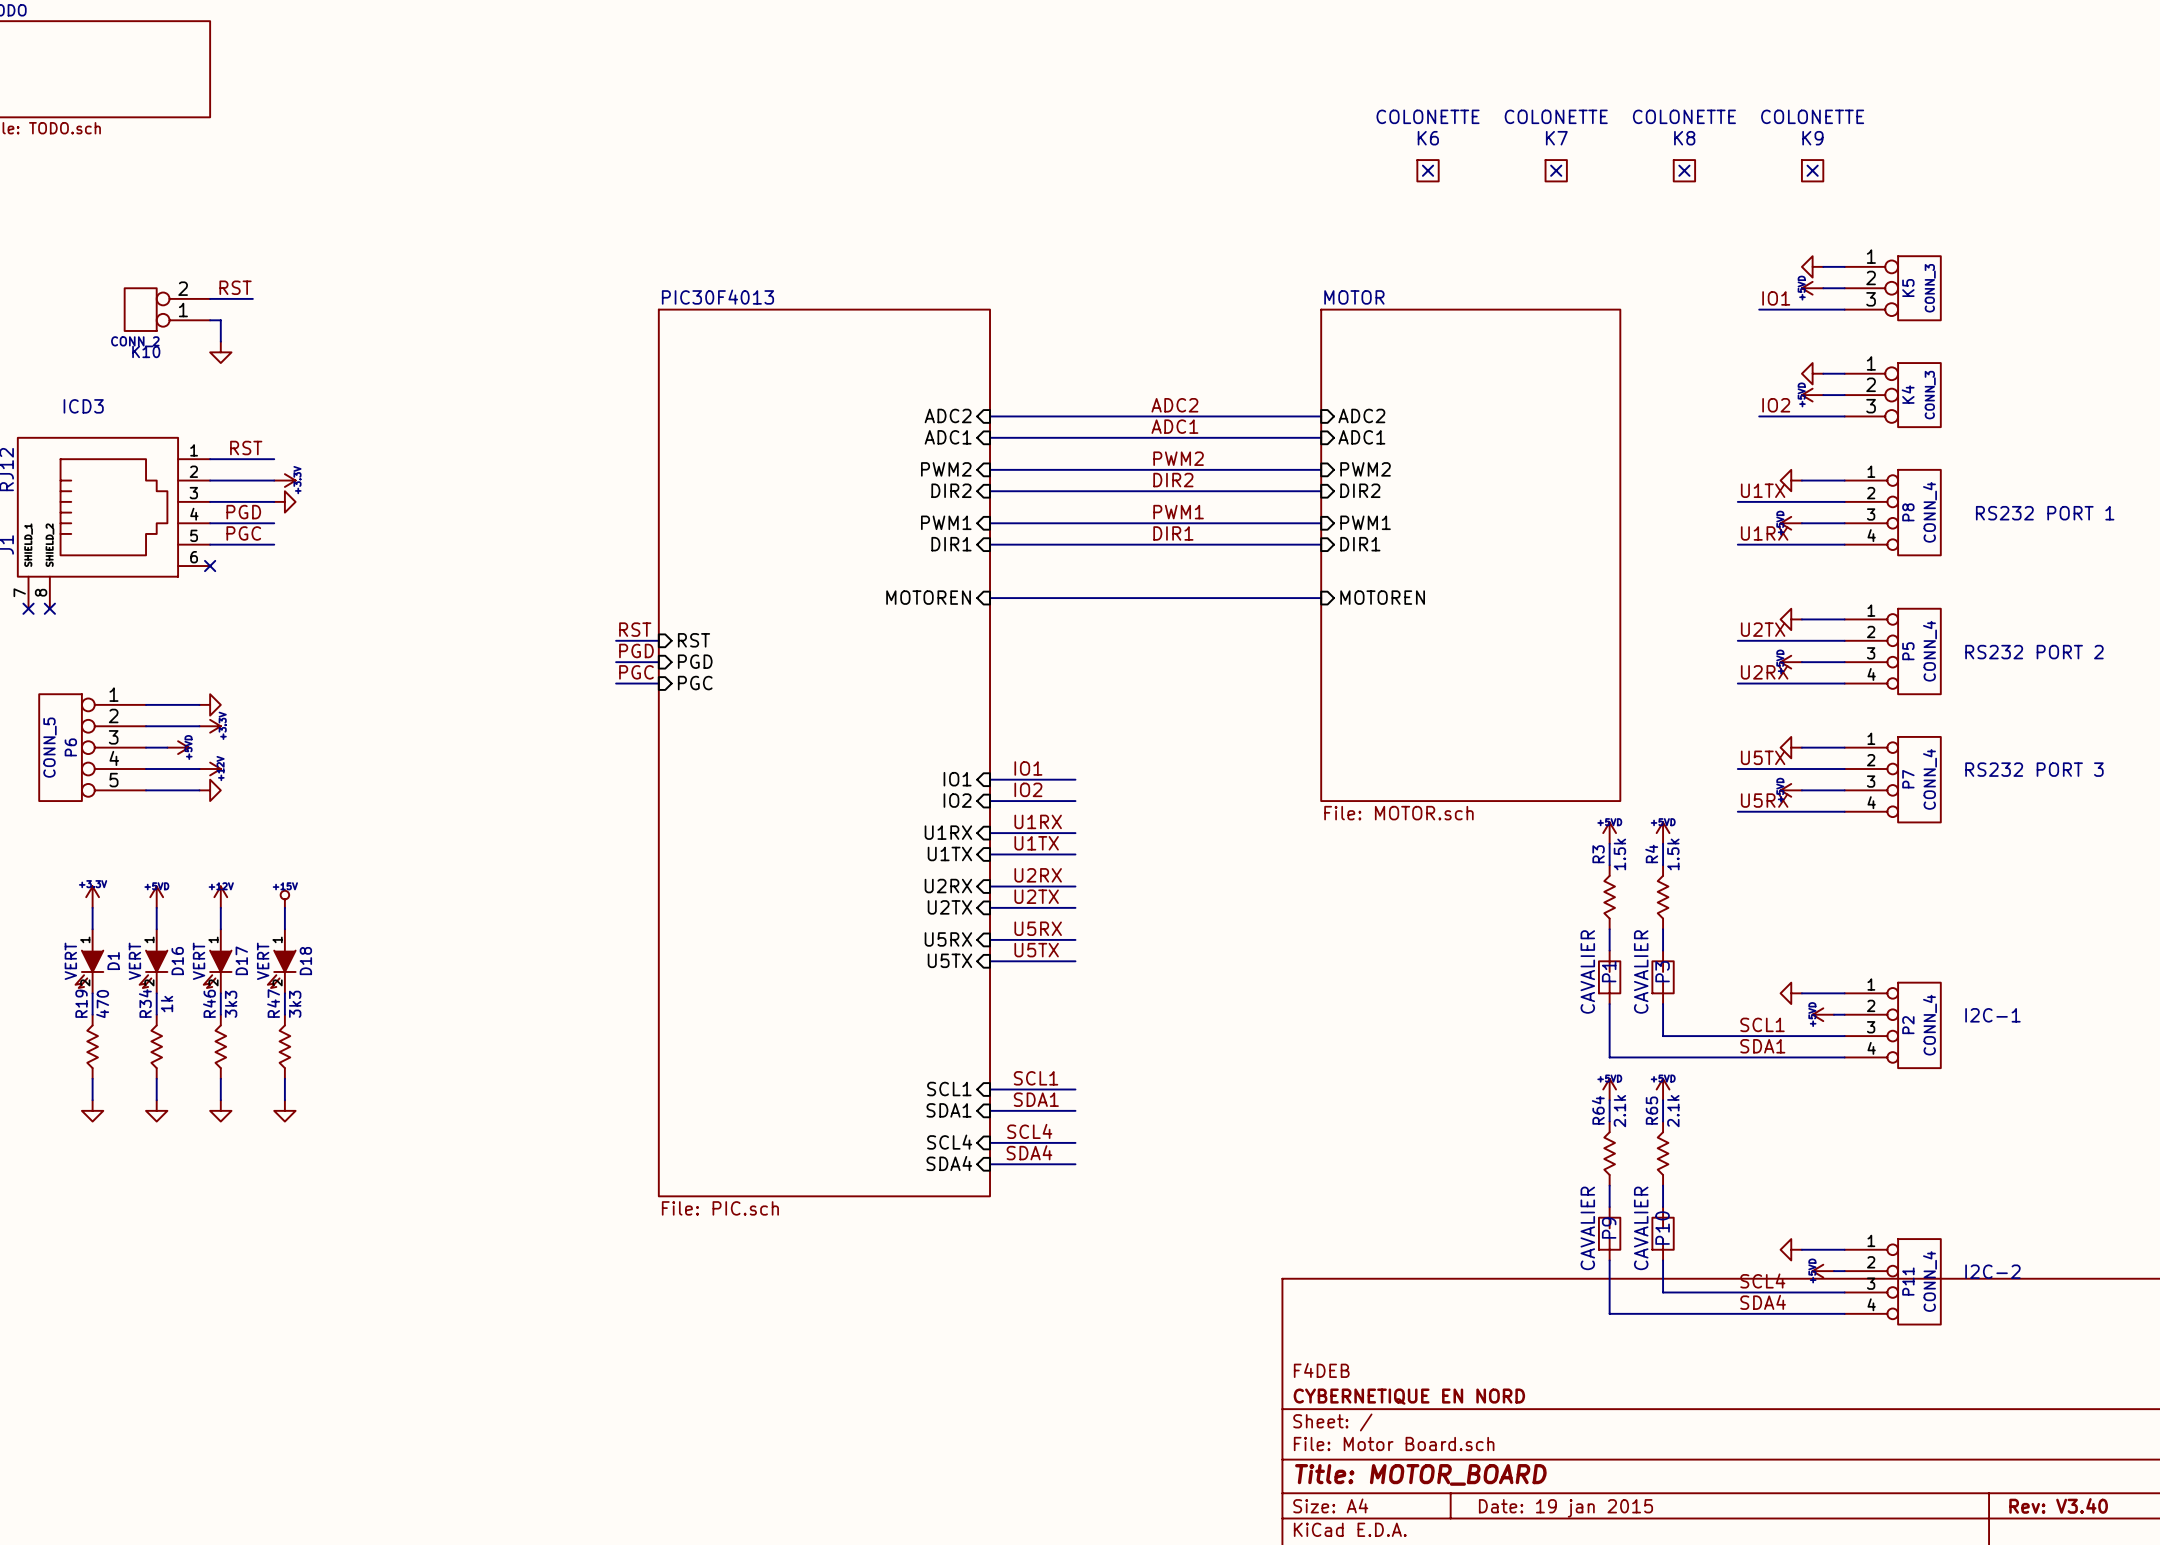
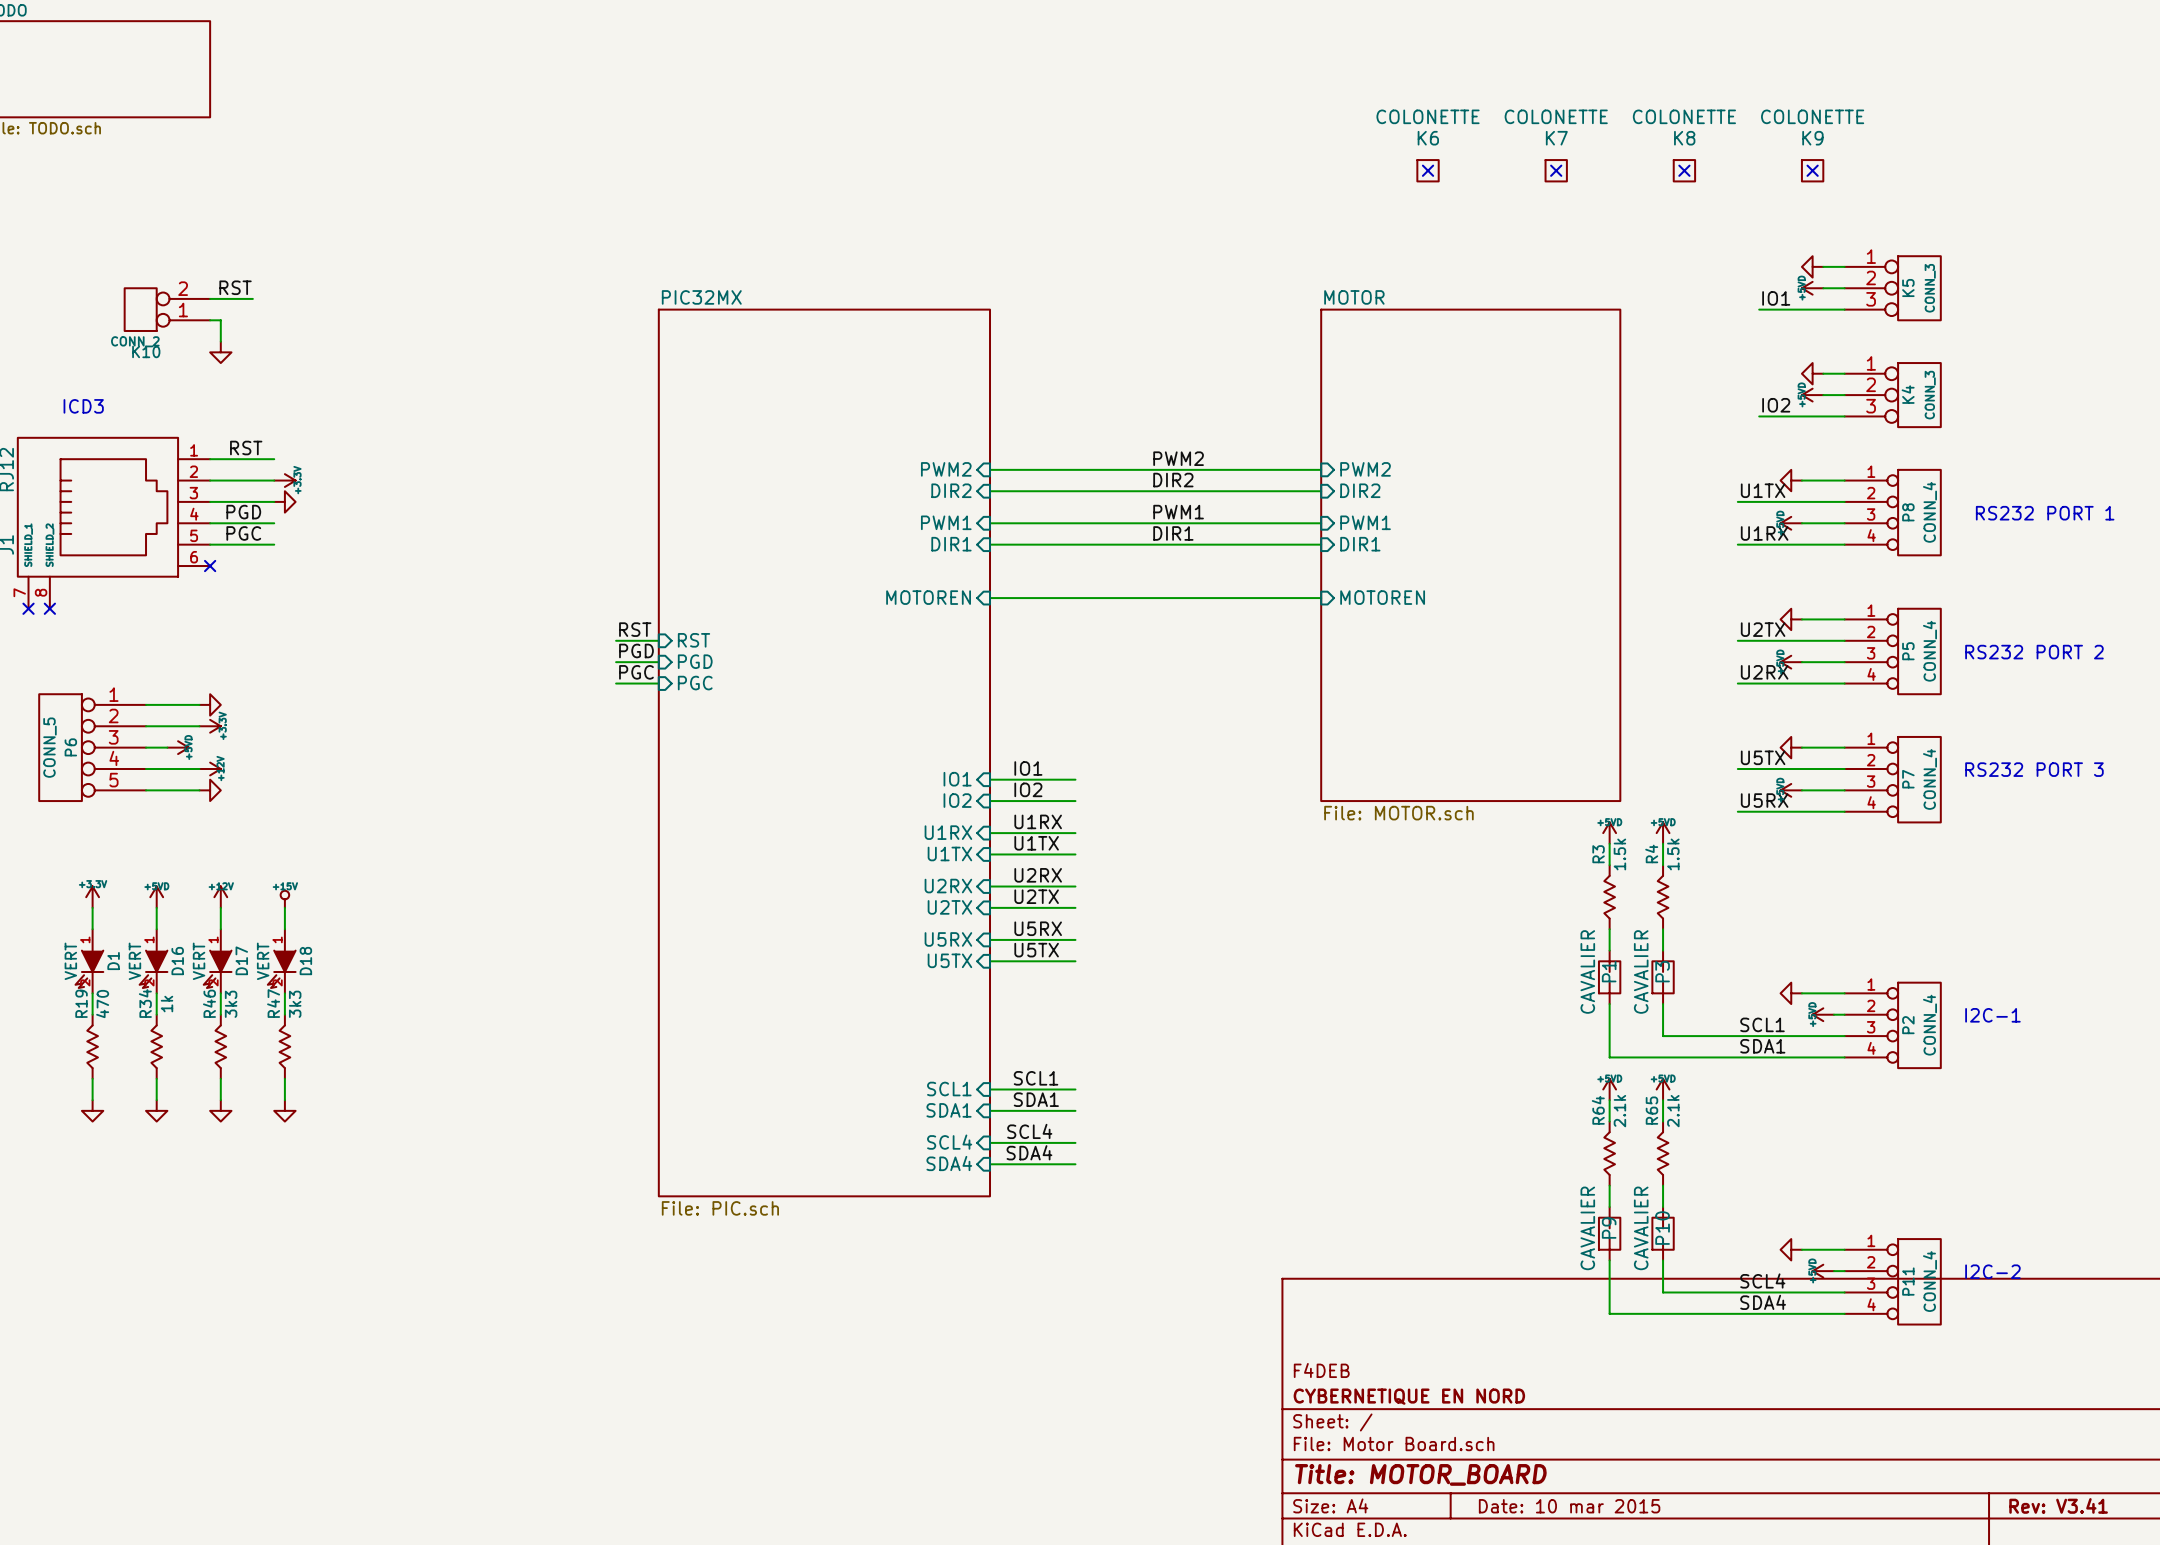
sheet PIC30F4013 name: PIC30F4013 (717, 297) -> PIC32MX (701, 297)
label: ADC2 (1174, 405) -> none
sheet pin: ADC2 (948, 415) -> none
sheet pin: ADC2 (1361, 415) -> none
wire: (990, 416) (1321, 416) -> none
label: ADC1 (1174, 426) -> none
sheet pin: ADC1 (948, 437) -> none
wire: (990, 437) (1321, 437) -> none
sheet pin: ADC1 (1361, 437) -> none
title block: Rev: V3.40 (2058, 1505) -> Rev: V3.41 (2058, 1505)
title block: Date: 19 jan 2015 (1565, 1508) -> Date: 10 mar 2015 (1569, 1506)

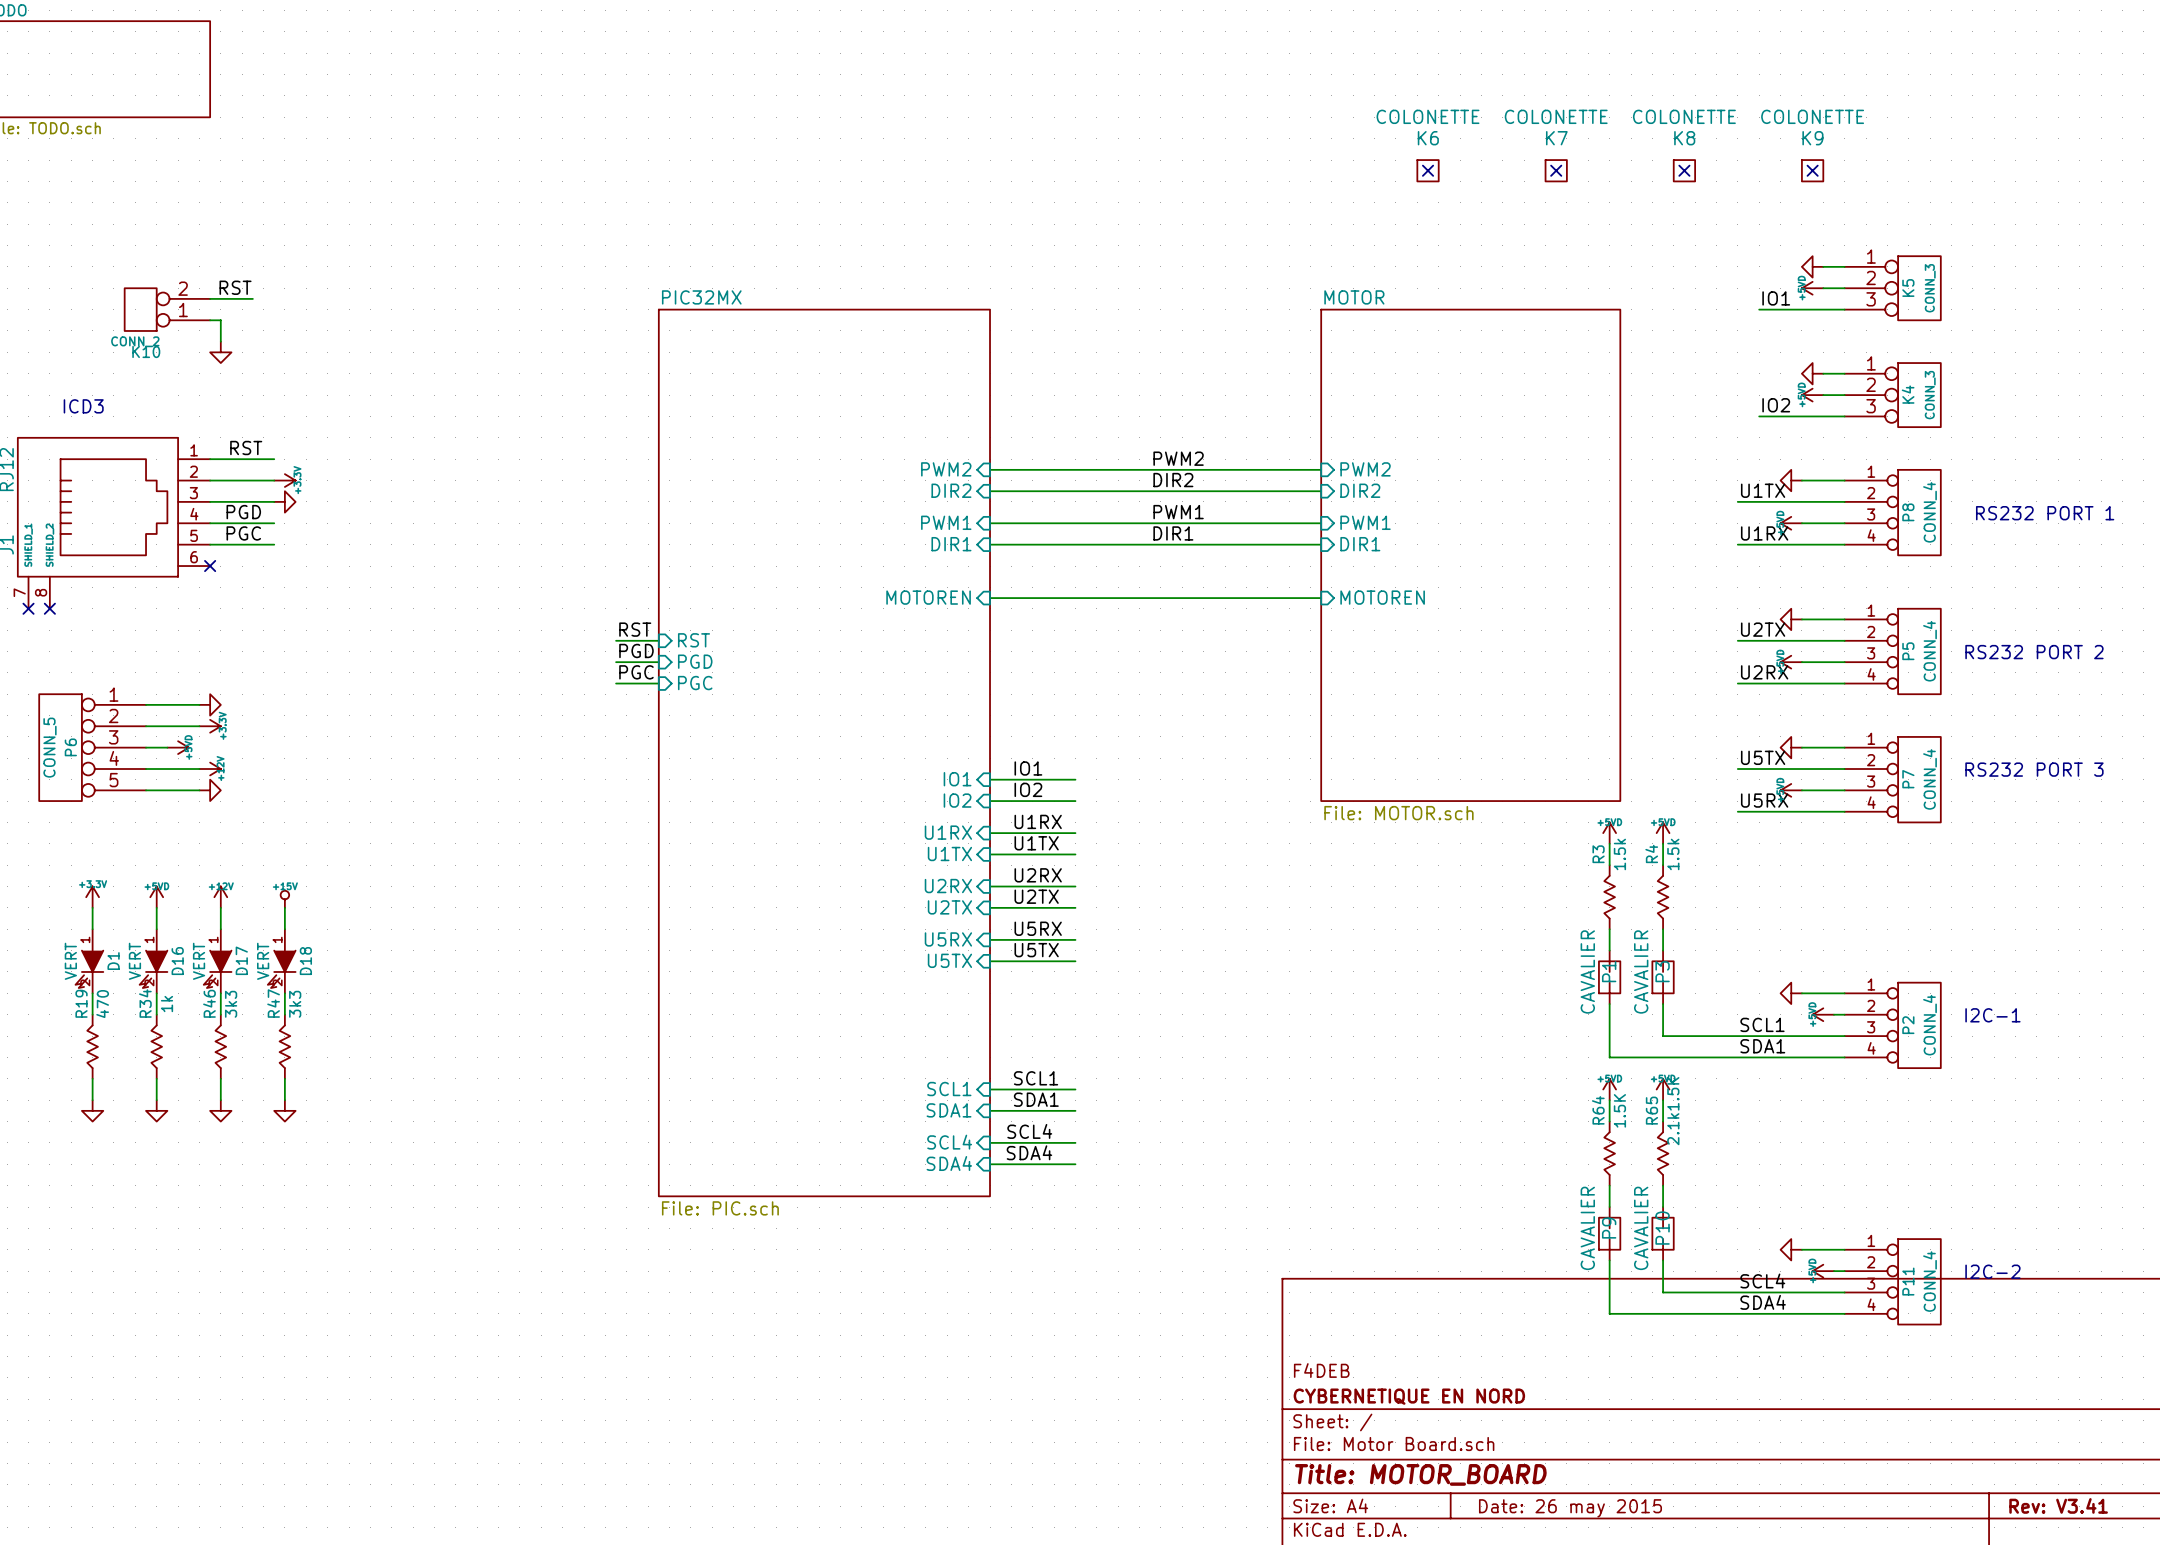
R64 value: 2.1k (1619, 1111) -> 1.5K (1619, 1110)
R65 value: 2.1k (1673, 1111) -> 2.1k1.5K (1673, 1111)
title block: Date: 10 mar 2015 (1569, 1506) -> Date: 26 may 2015 (1570, 1508)

